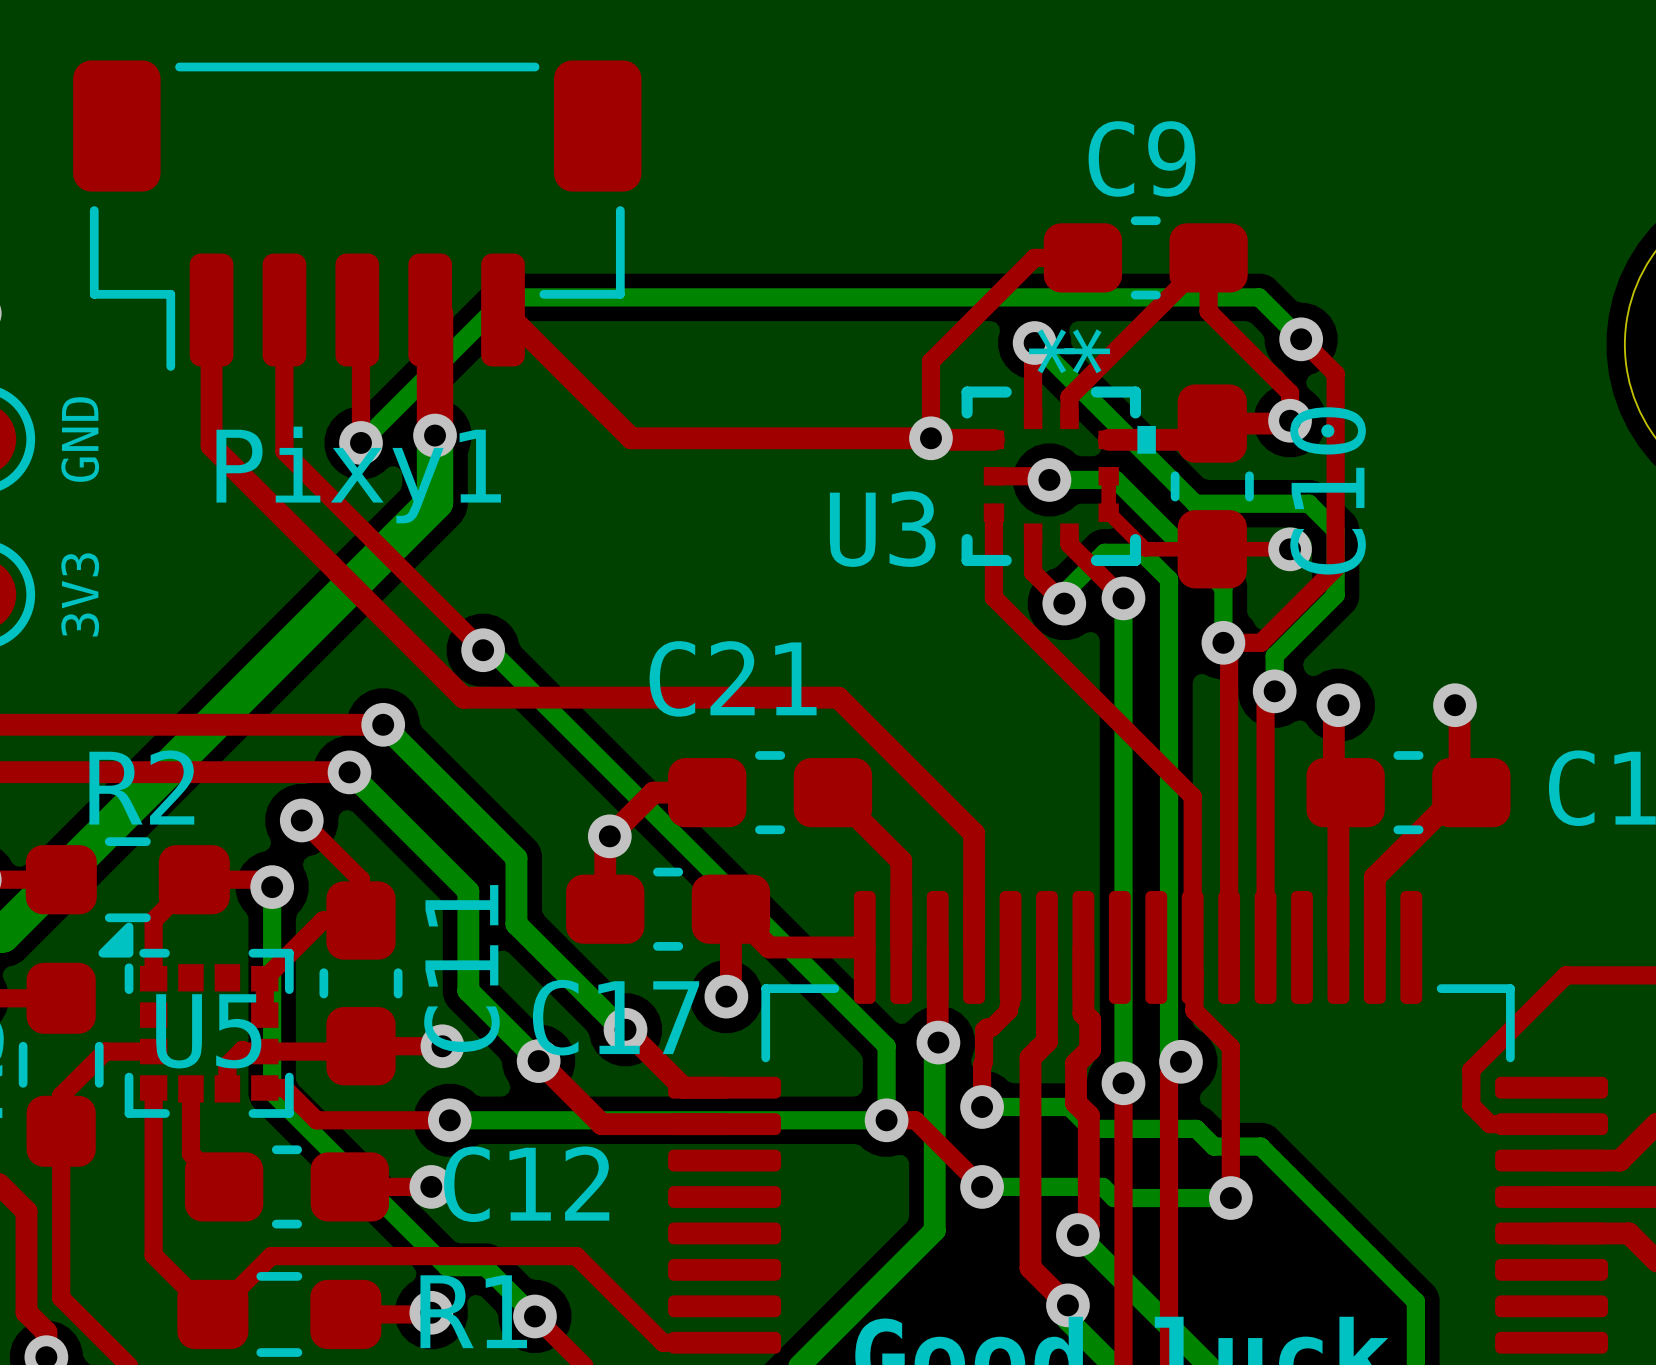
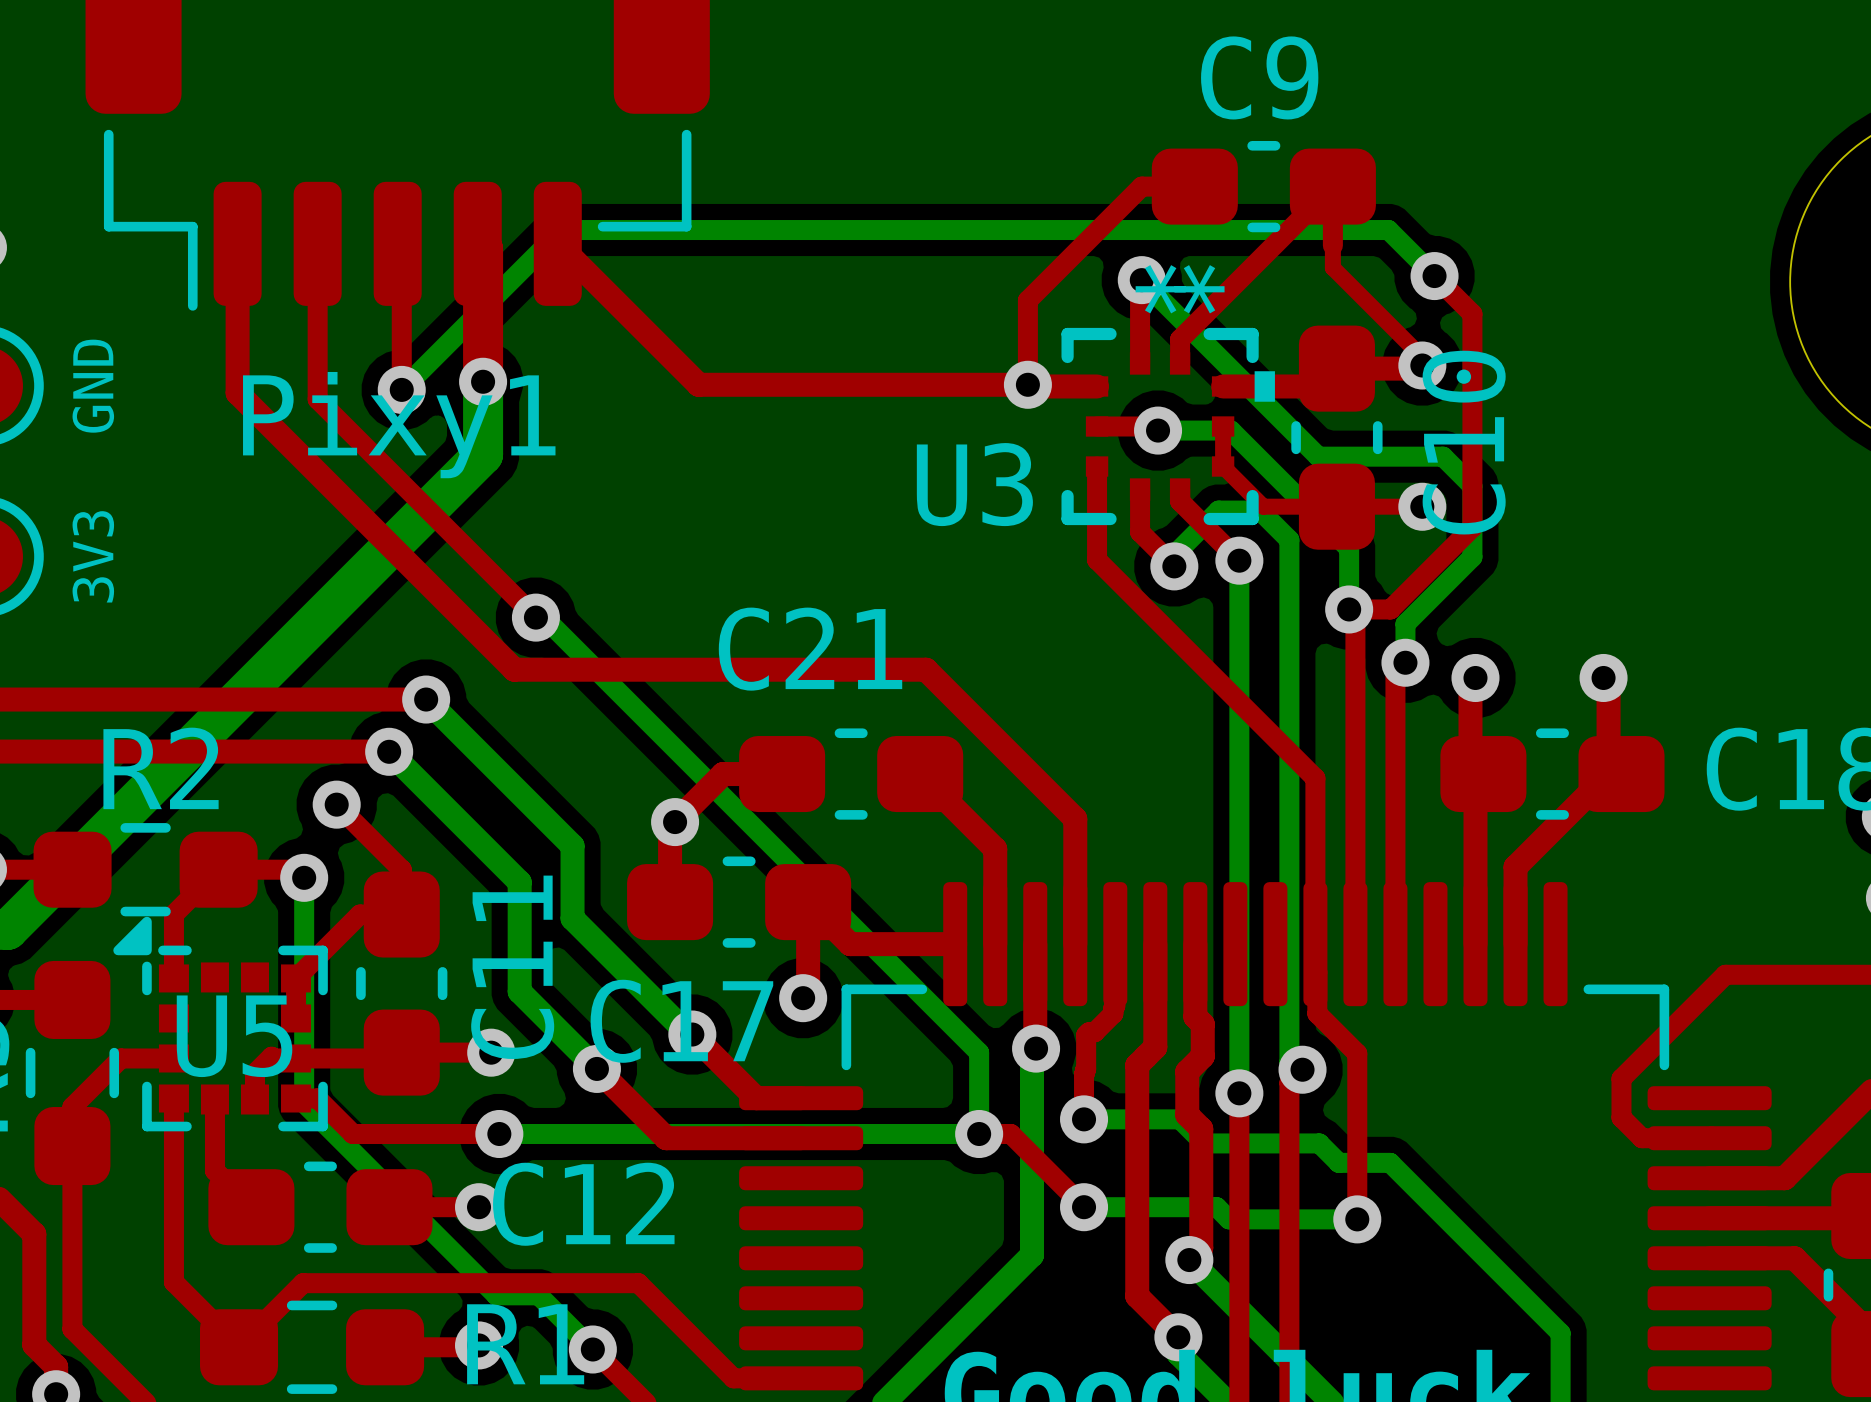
top track: (1208, 311) (1290, 392) (1290, 420) -> (1332, 245) (1332, 267) (1422, 357)

